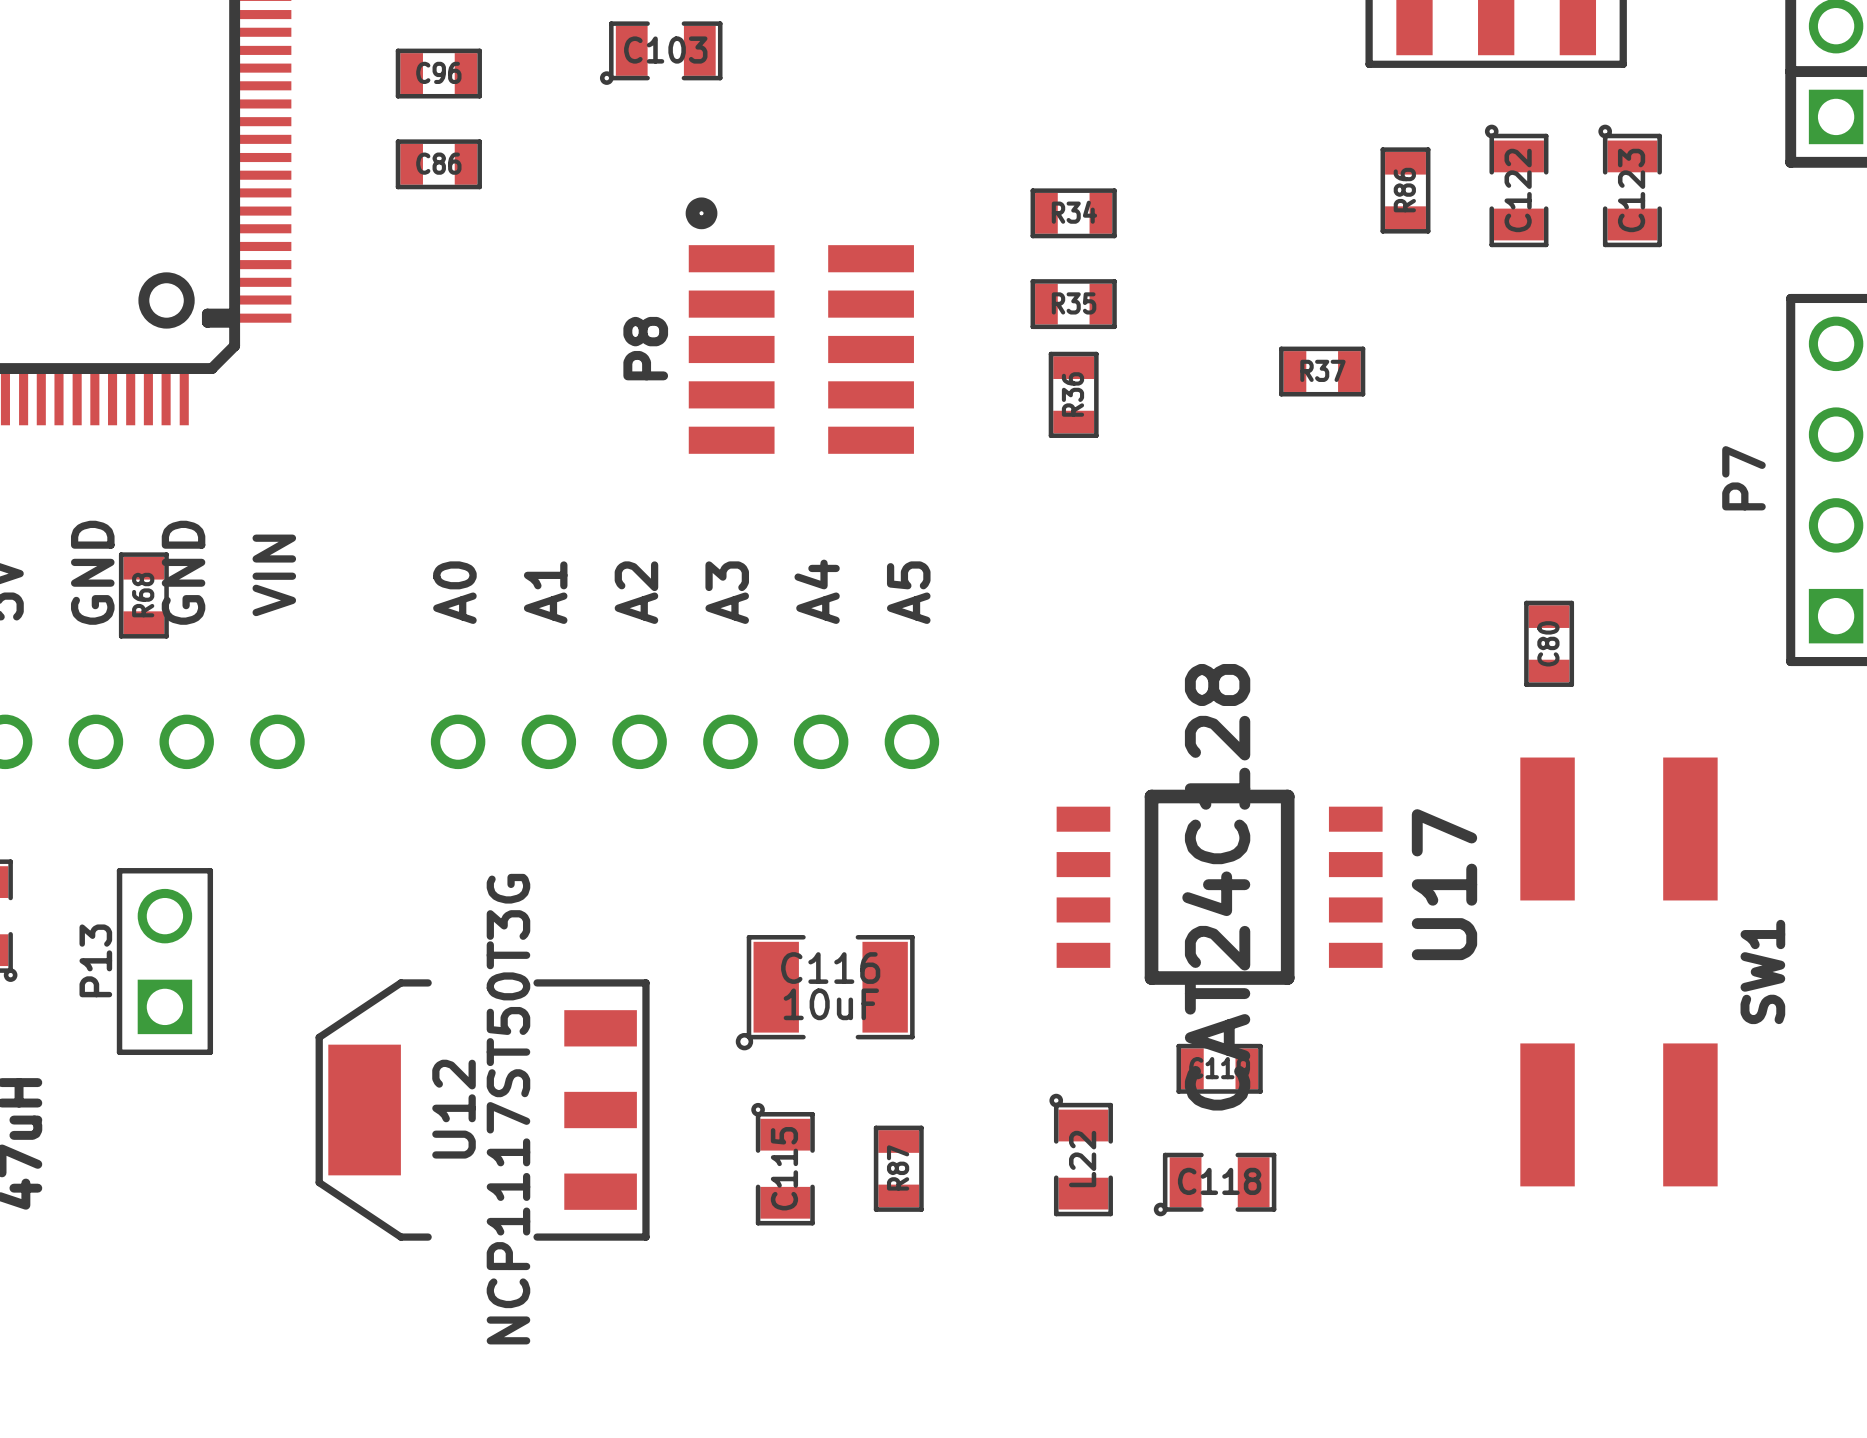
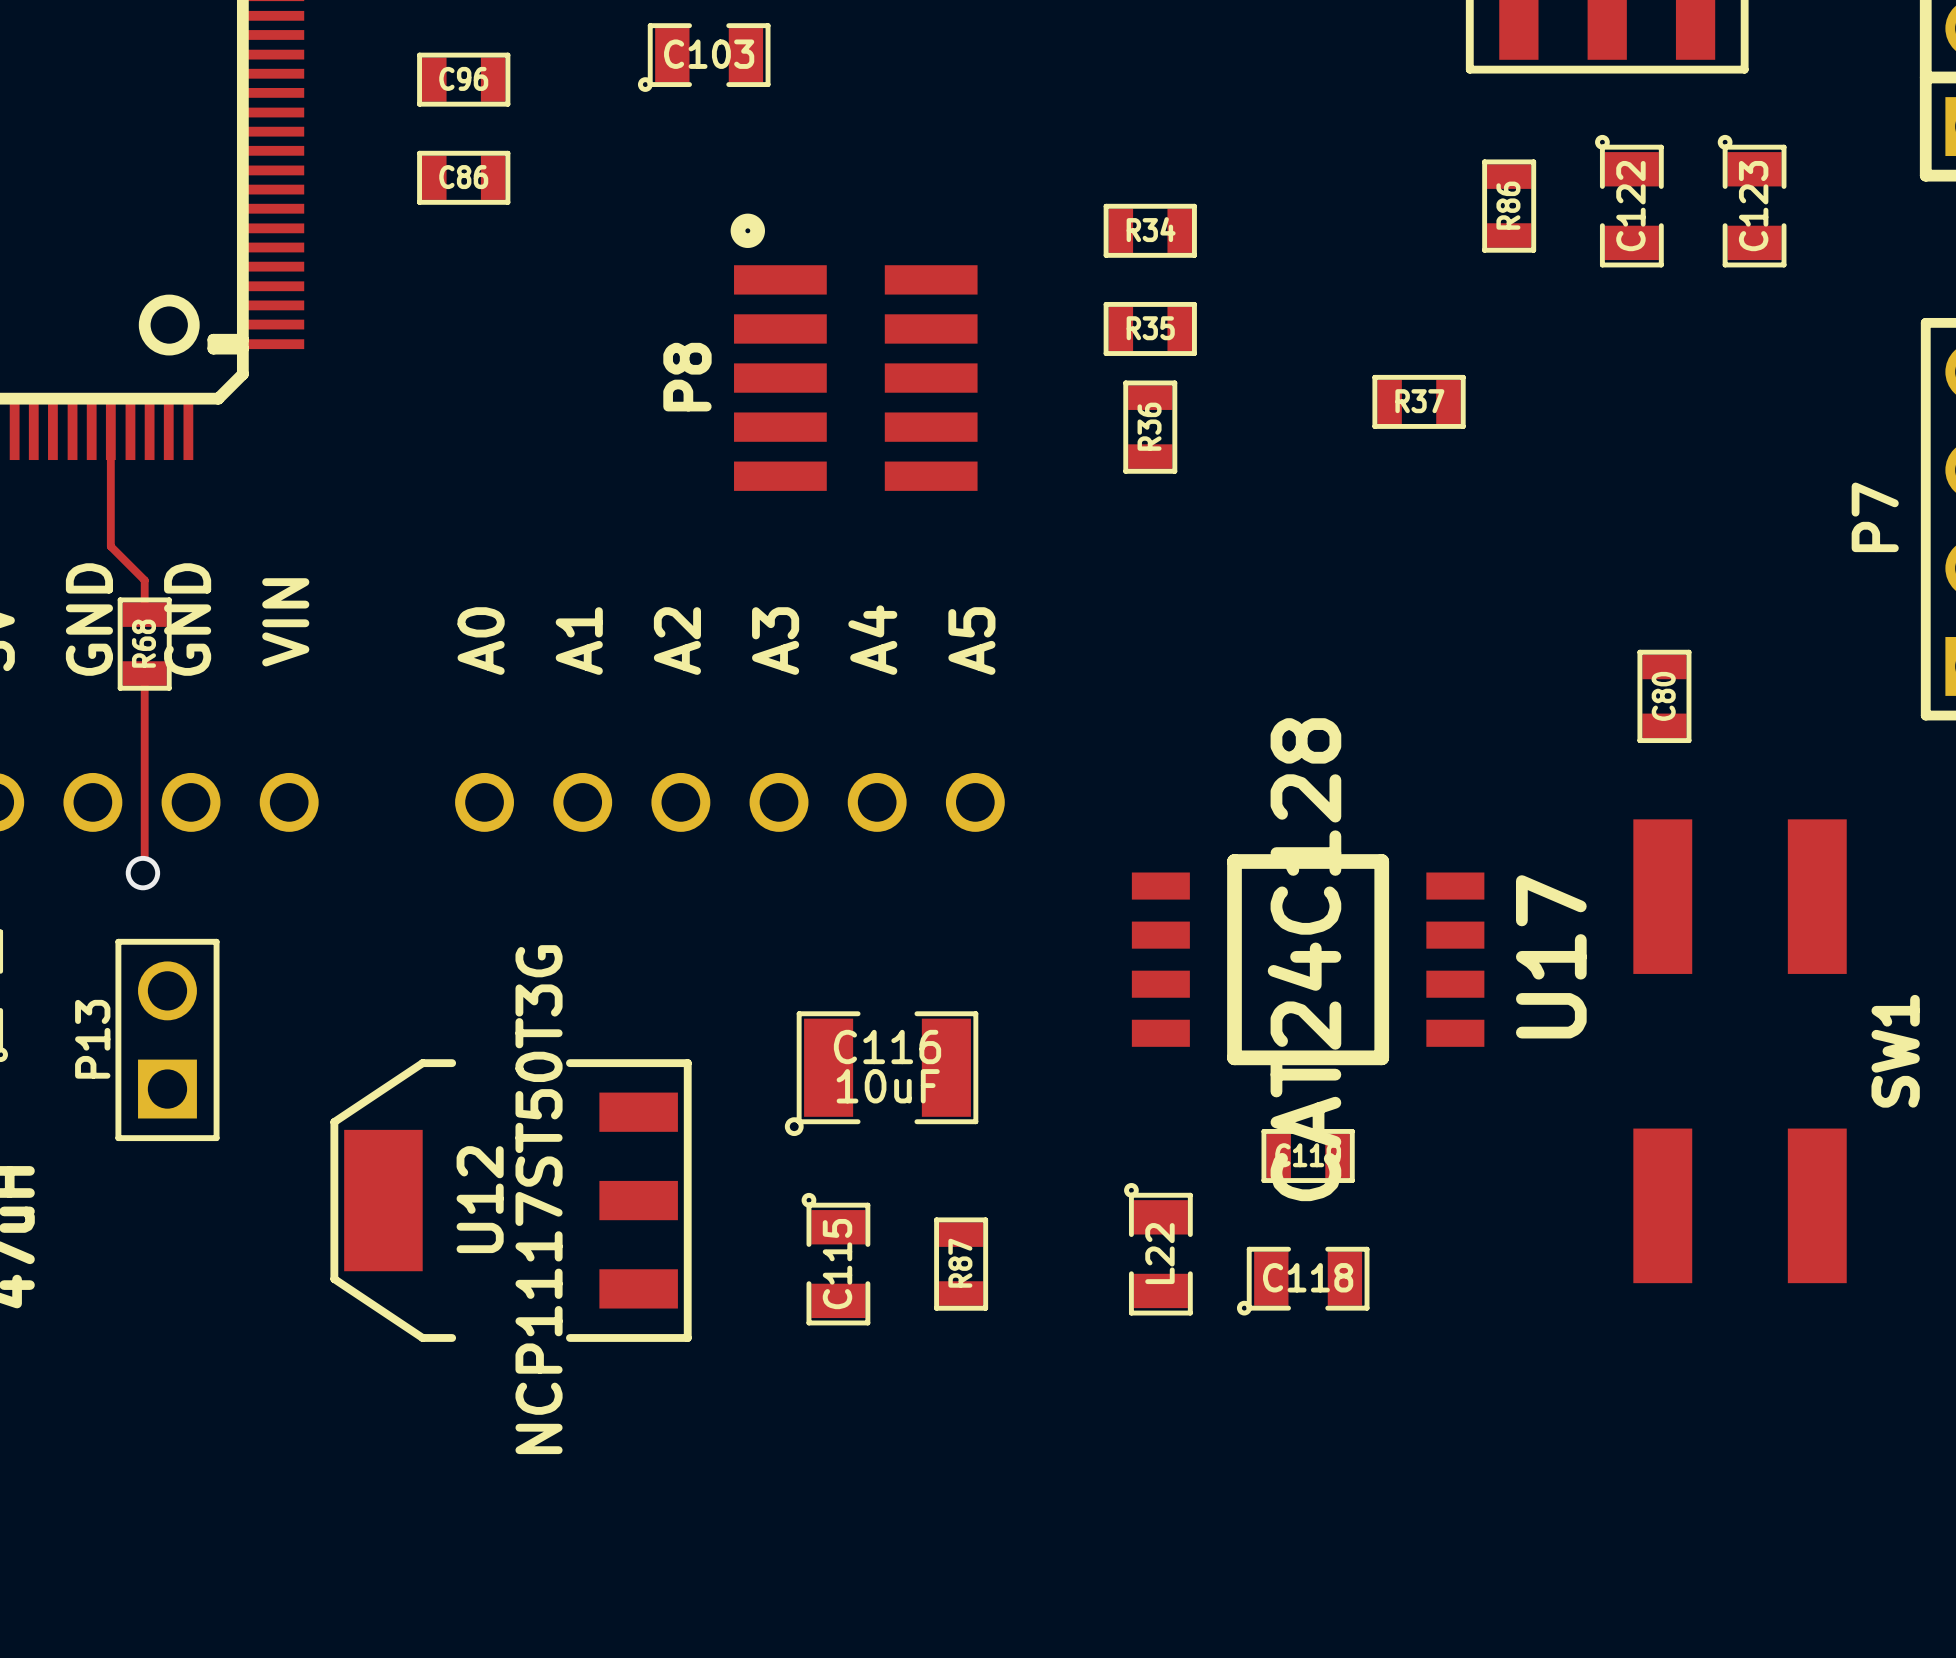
top track: none -> (110, 430) (110, 546) (144, 580) (144, 614)
top track: none -> (144, 673) (144, 871) (142, 873)
via: none -> (142, 873)

